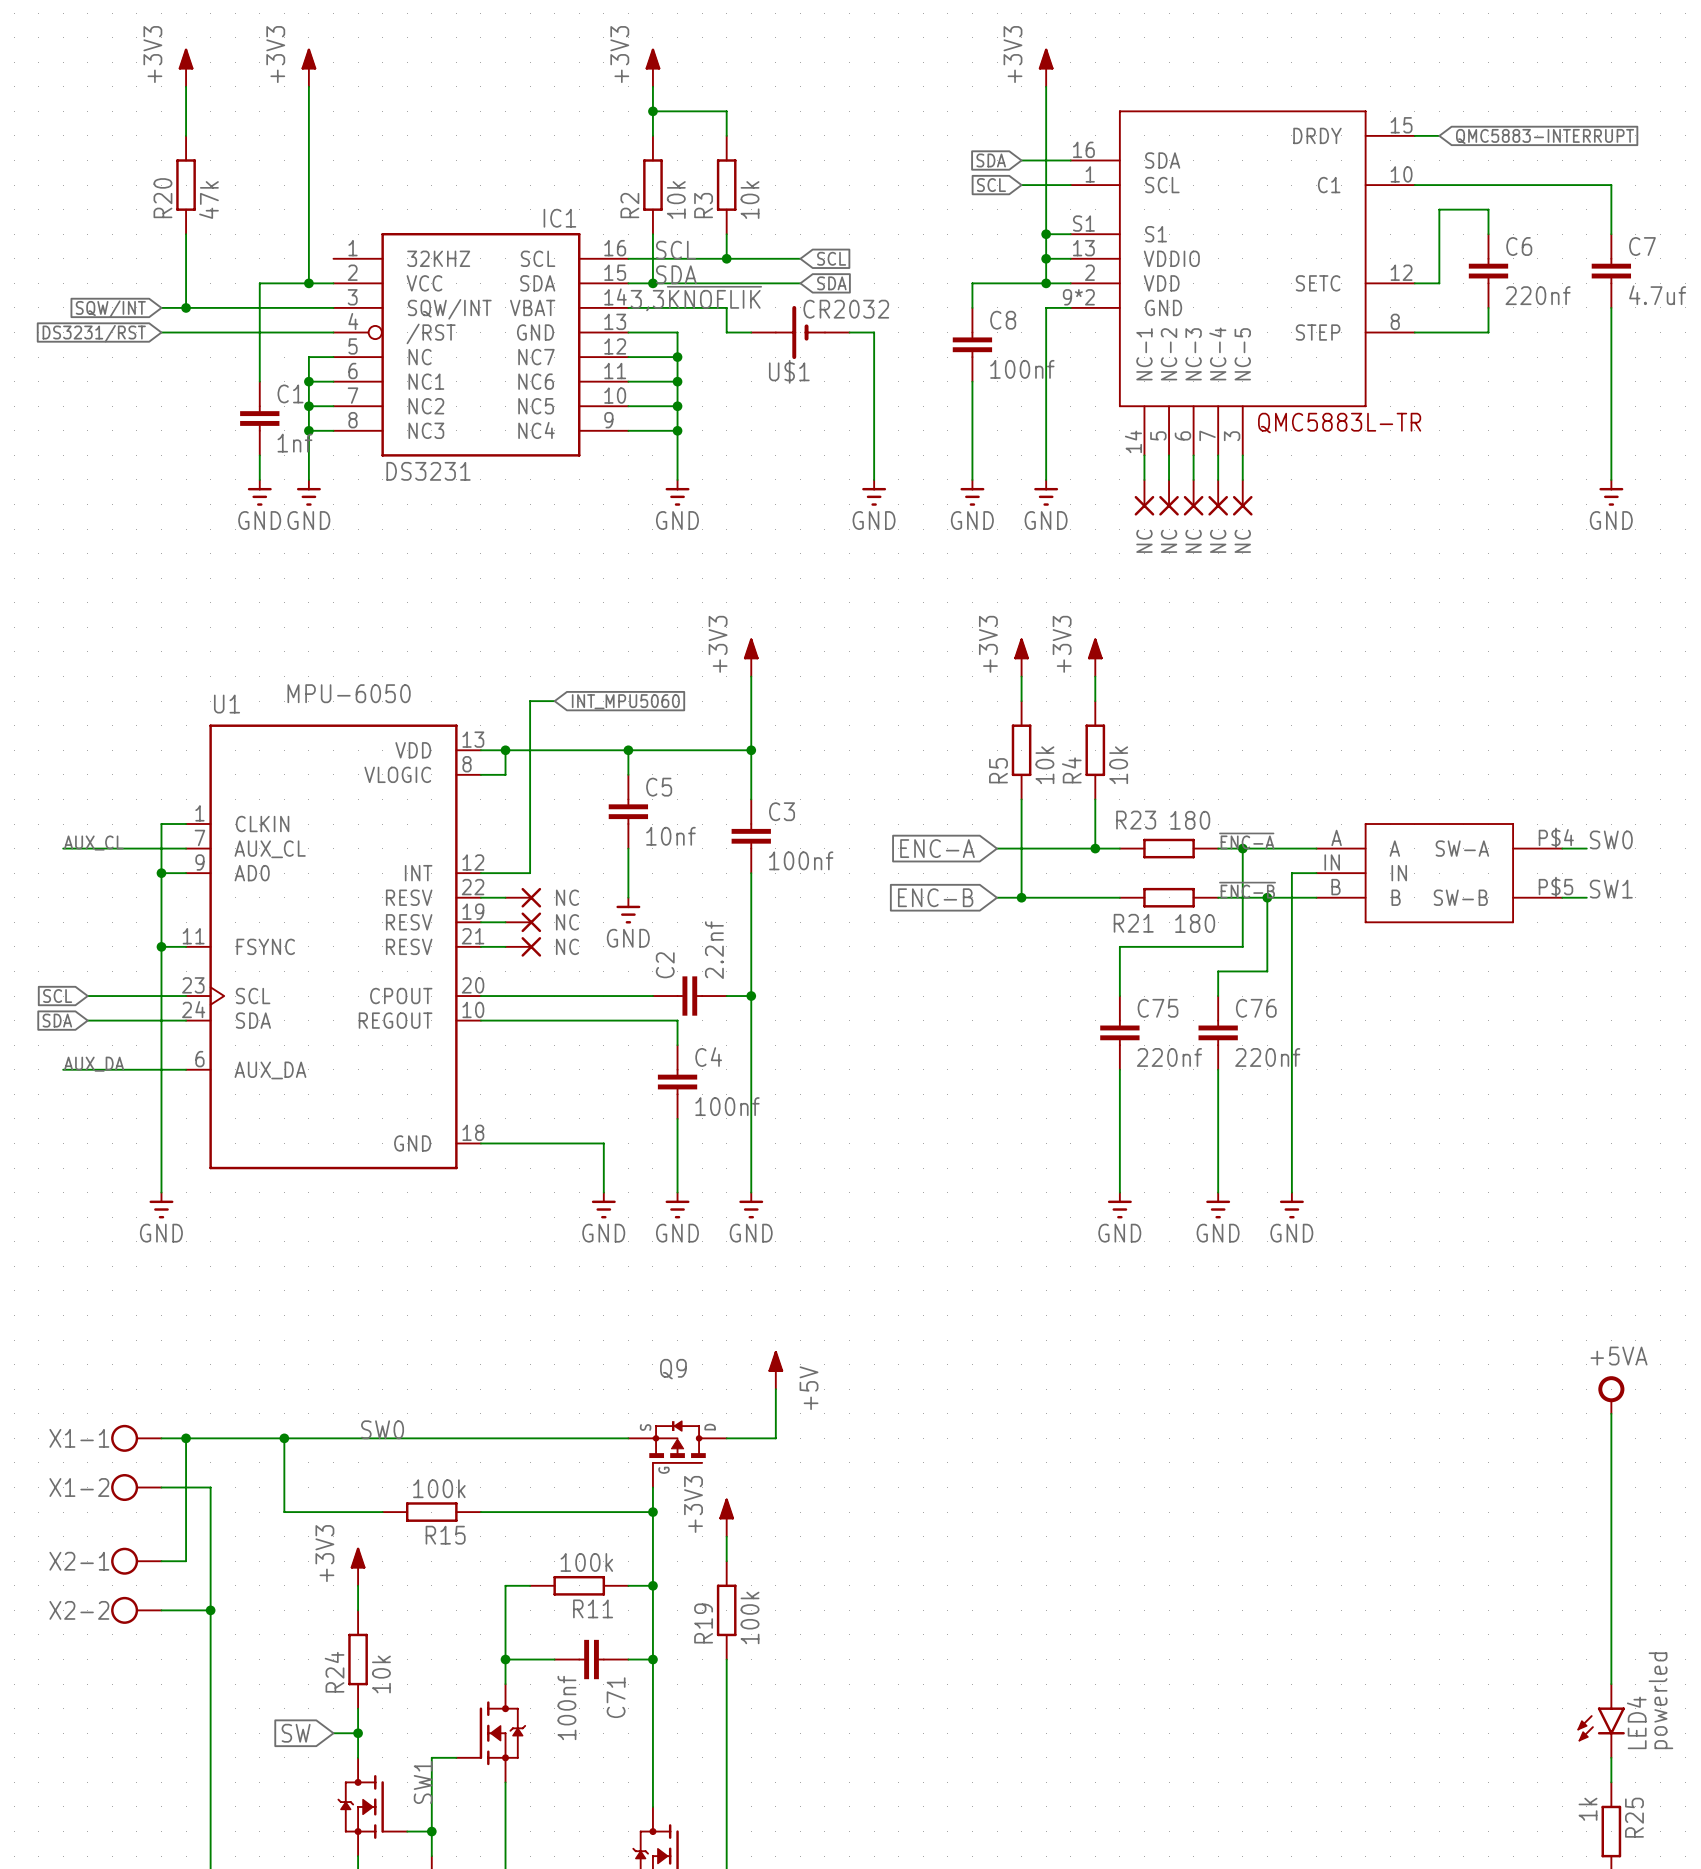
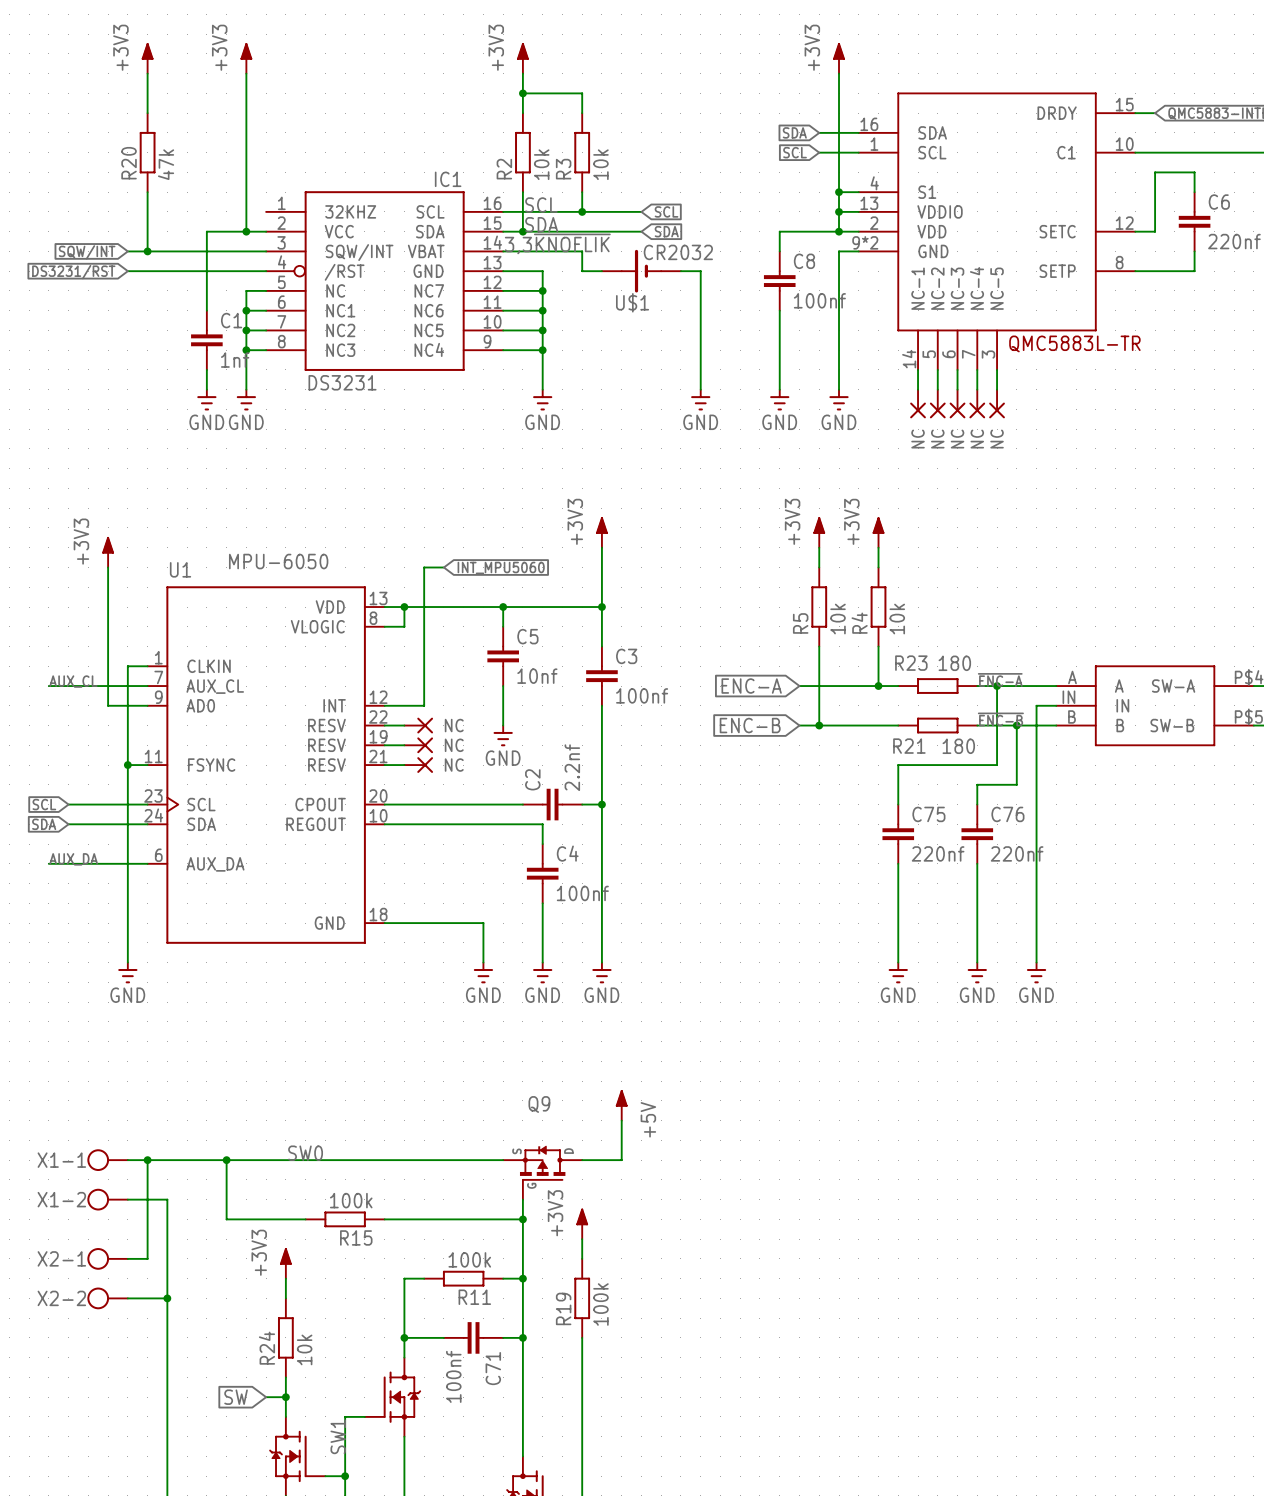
part pin number: S1 (1083, 223) -> 4 (874, 183)
part pin name: STEP (1318, 332) -> SETP (1057, 271)
power symbol: none -> +3V3 (108, 552)
wire: none -> (108, 567) (108, 705) (127, 705)
junction: (161, 873) -> none

